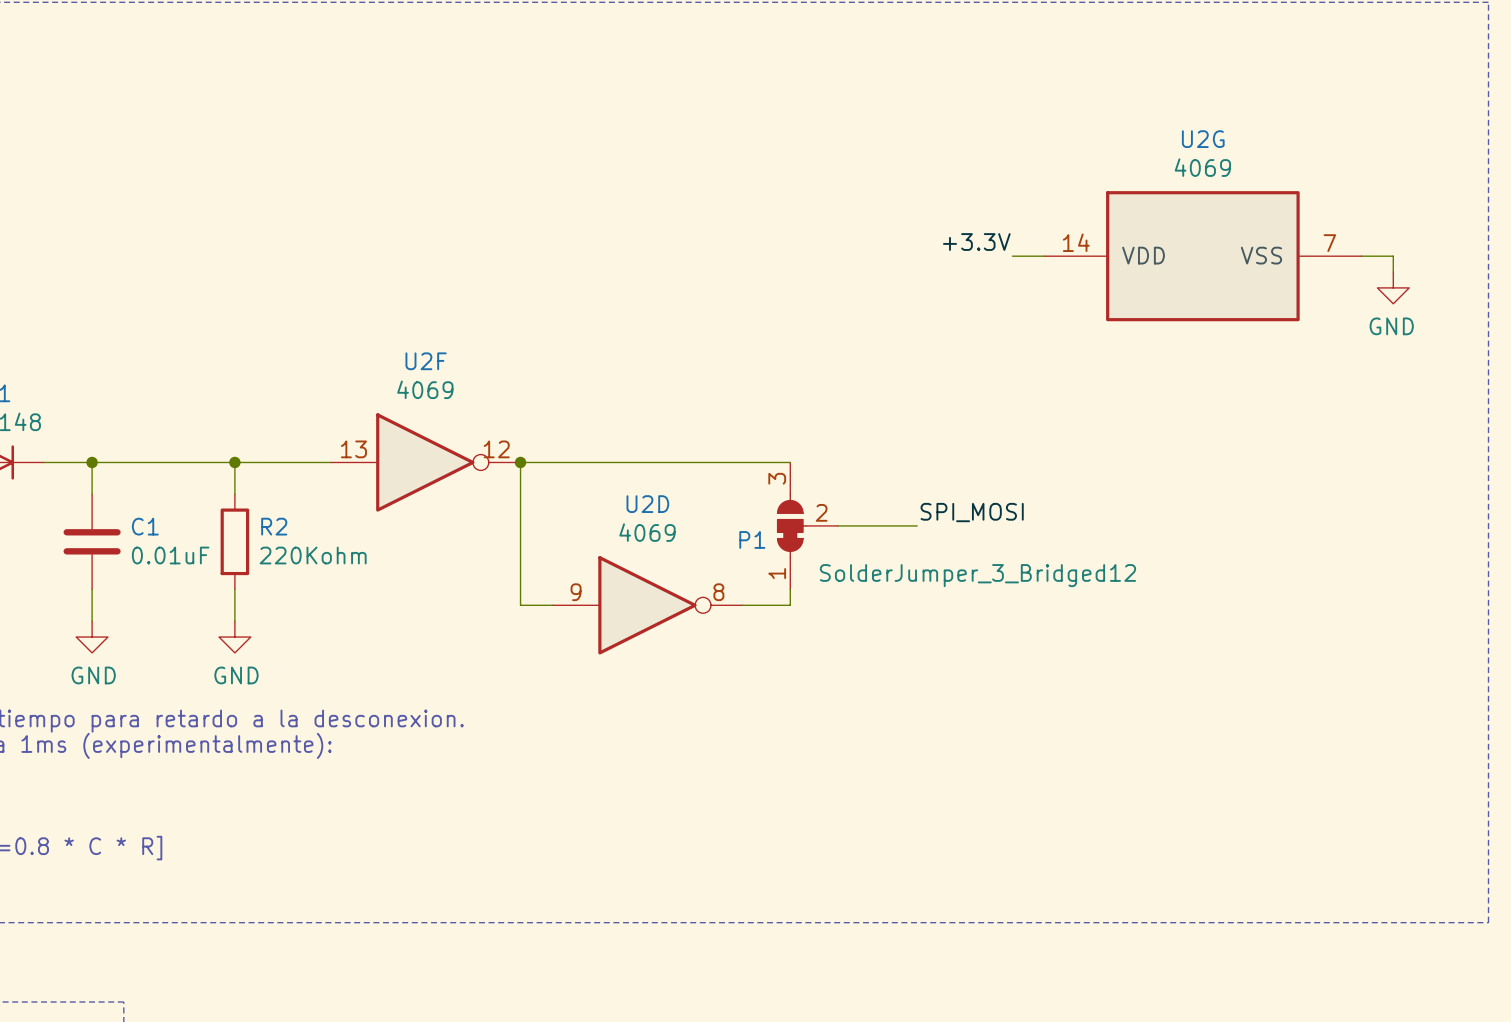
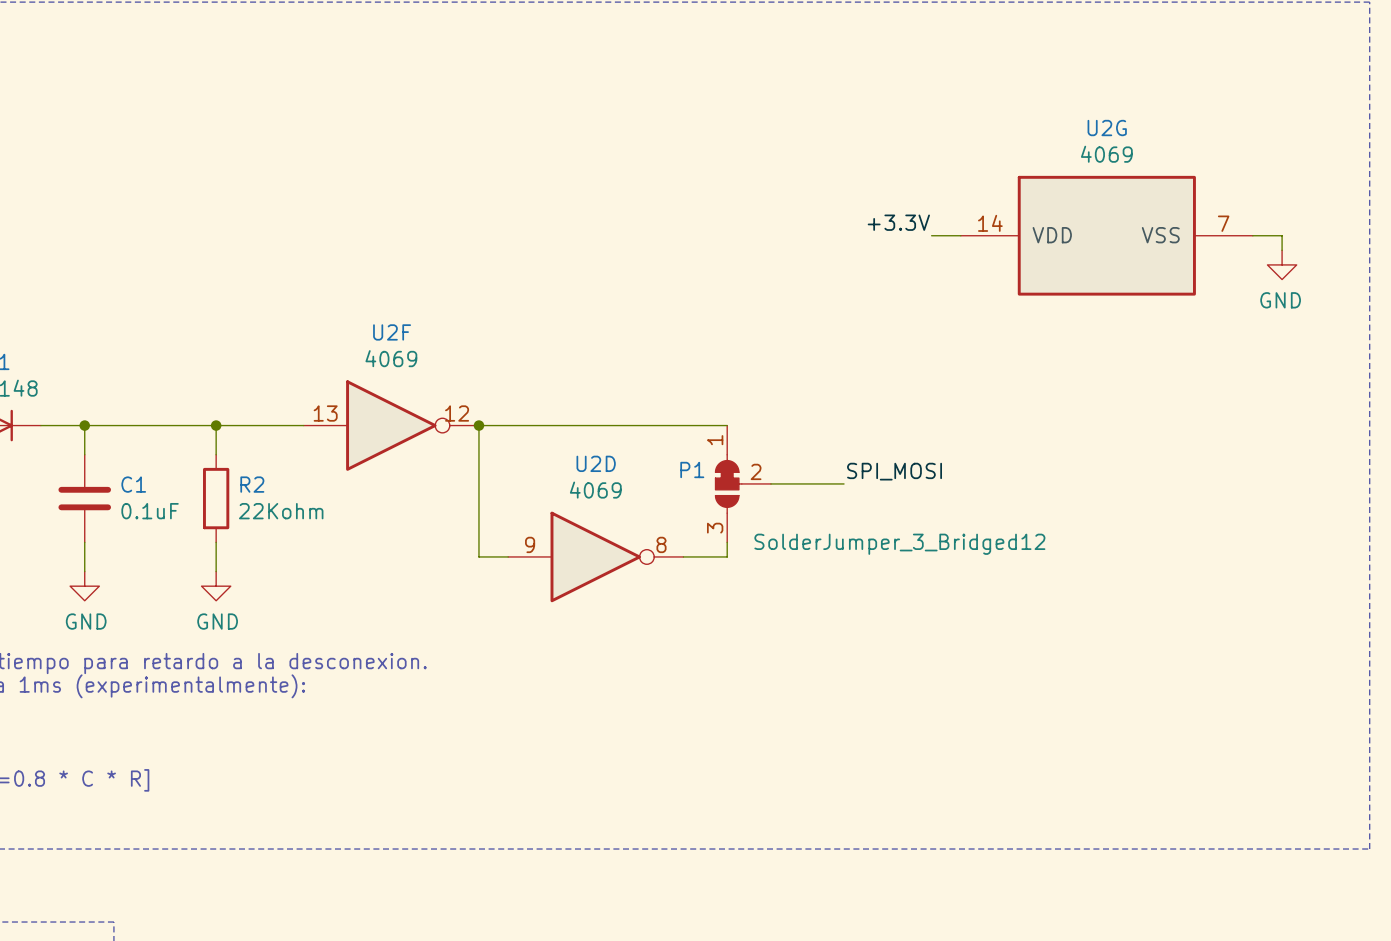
P1 flip: as is (791, 525) -> up-down (728, 483)
C1 value: 0.01uF (170, 555) -> 0.1uF (150, 511)
R2 value: 220Kohm (313, 555) -> 22Kohm (281, 511)

